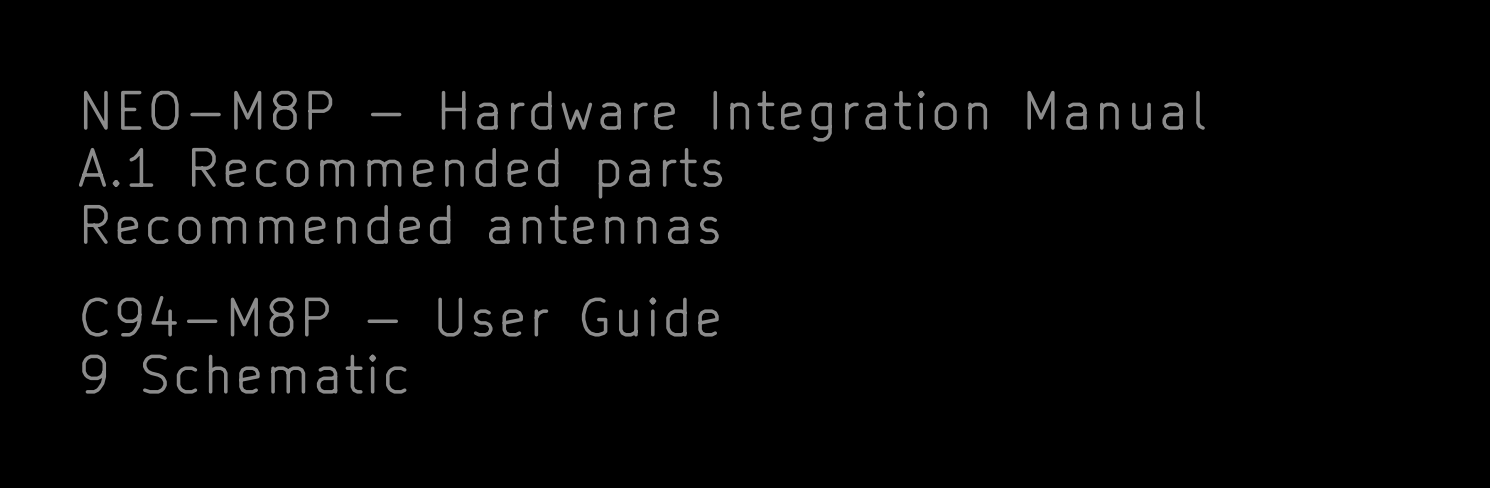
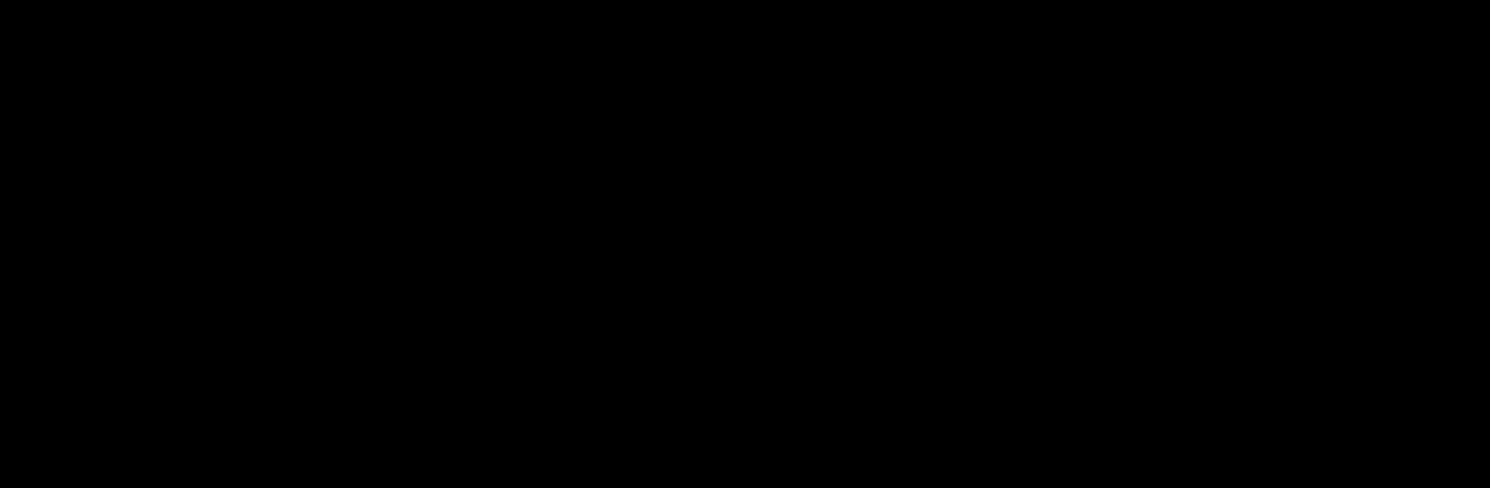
text: NEO-M8P - Hardware Integration Manual (644, 116) -> none
text: A.1 Recommended parts (400, 173) -> none
text: Recommended antennas (401, 224) -> none
text: C94-M8P - User Guide (400, 316) -> none
text: 9 Schematic (244, 374) -> none

